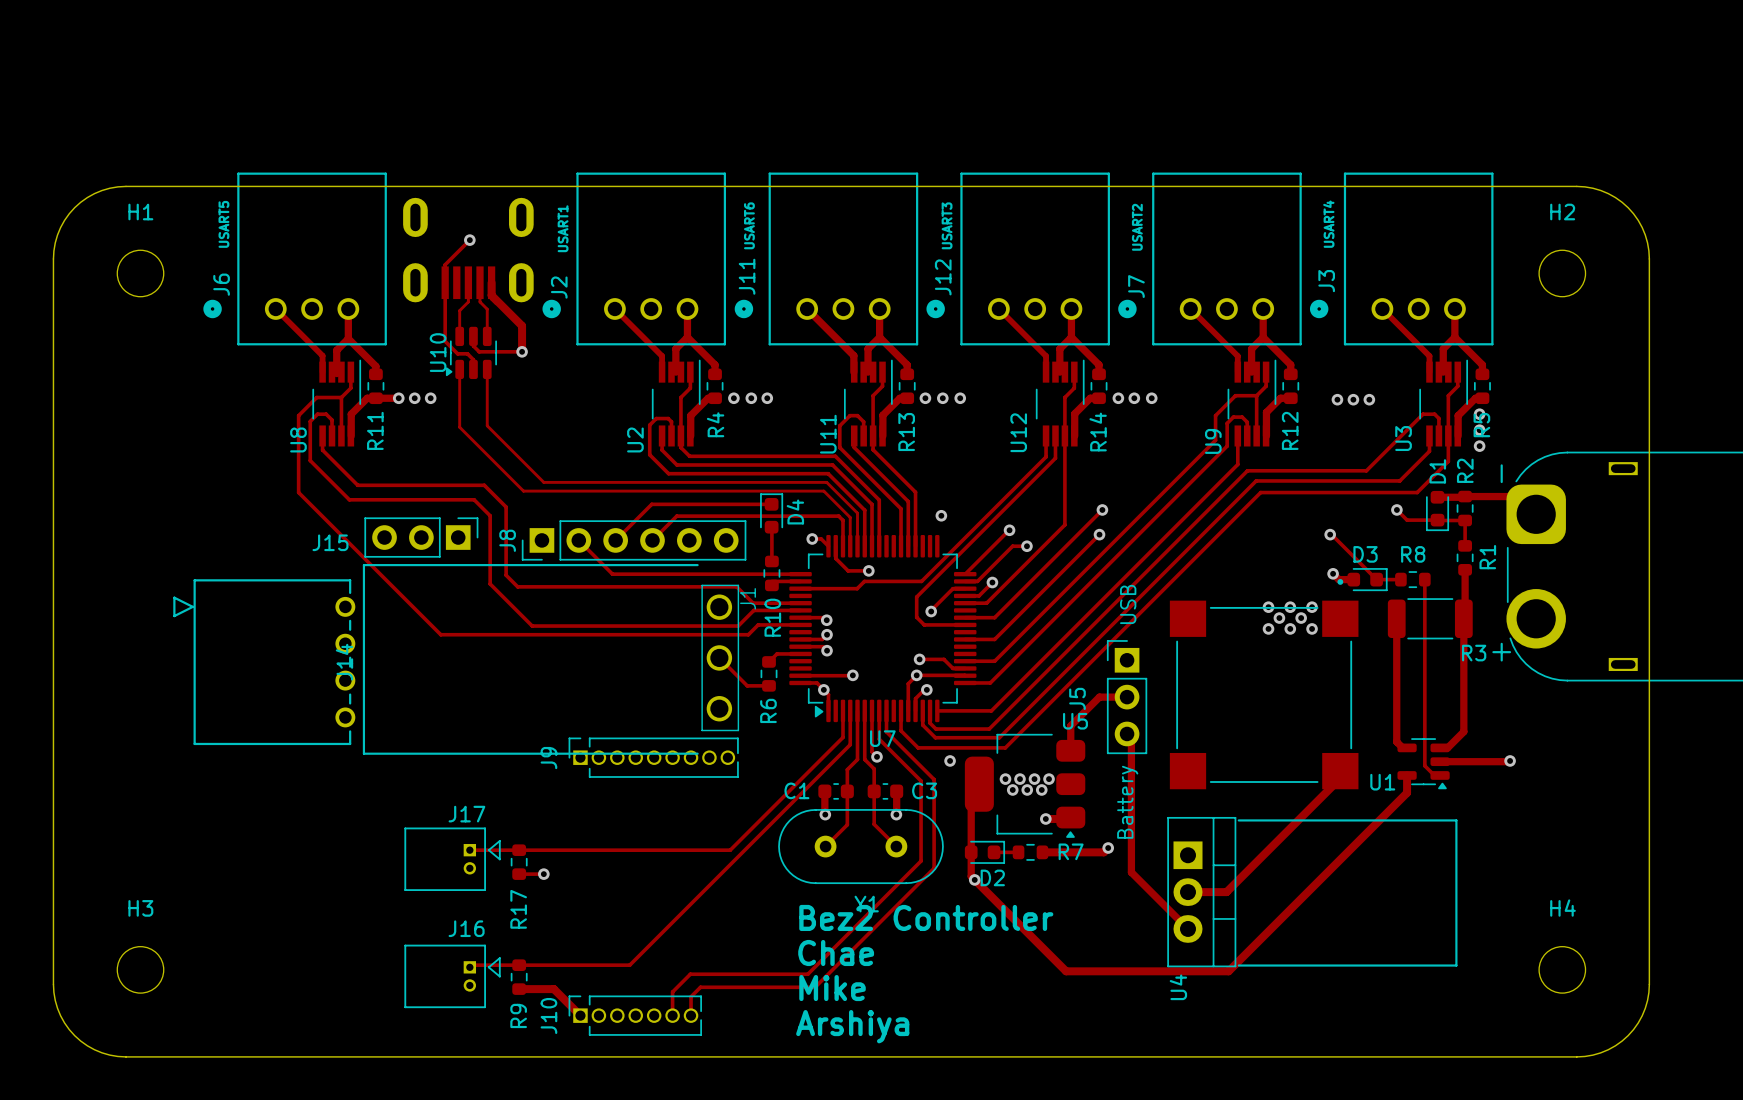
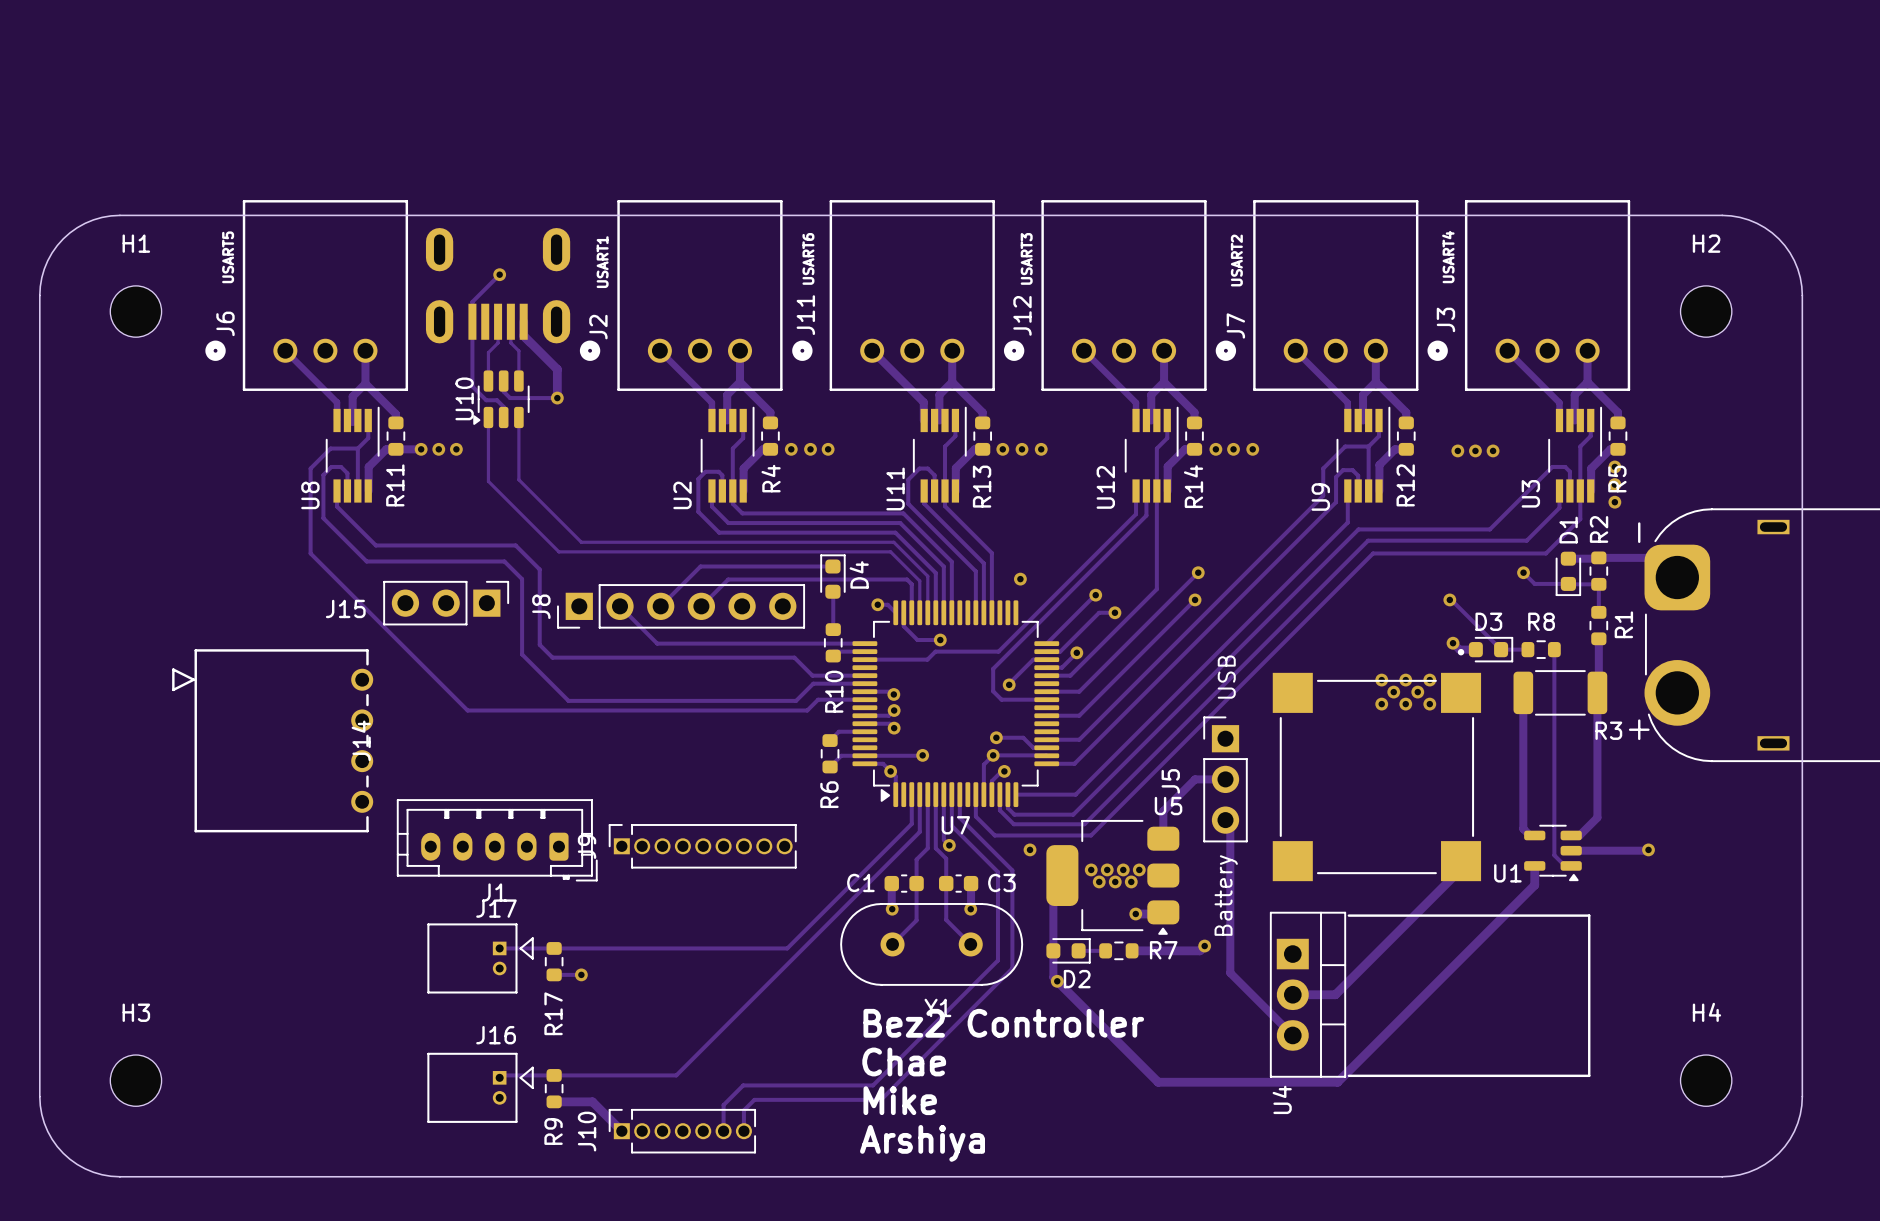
line: (697, 565) (363, 565) (363, 753) (697, 753) -> none
J1 footprint: [701, 584, 740, 732] -> [396, 799, 598, 882]
J1 name position: J1 (748, 598) -> J1 (494, 892)
track: (719, 657) (747, 685) (769, 685) -> (864, 755) (841, 755) (830, 766)

